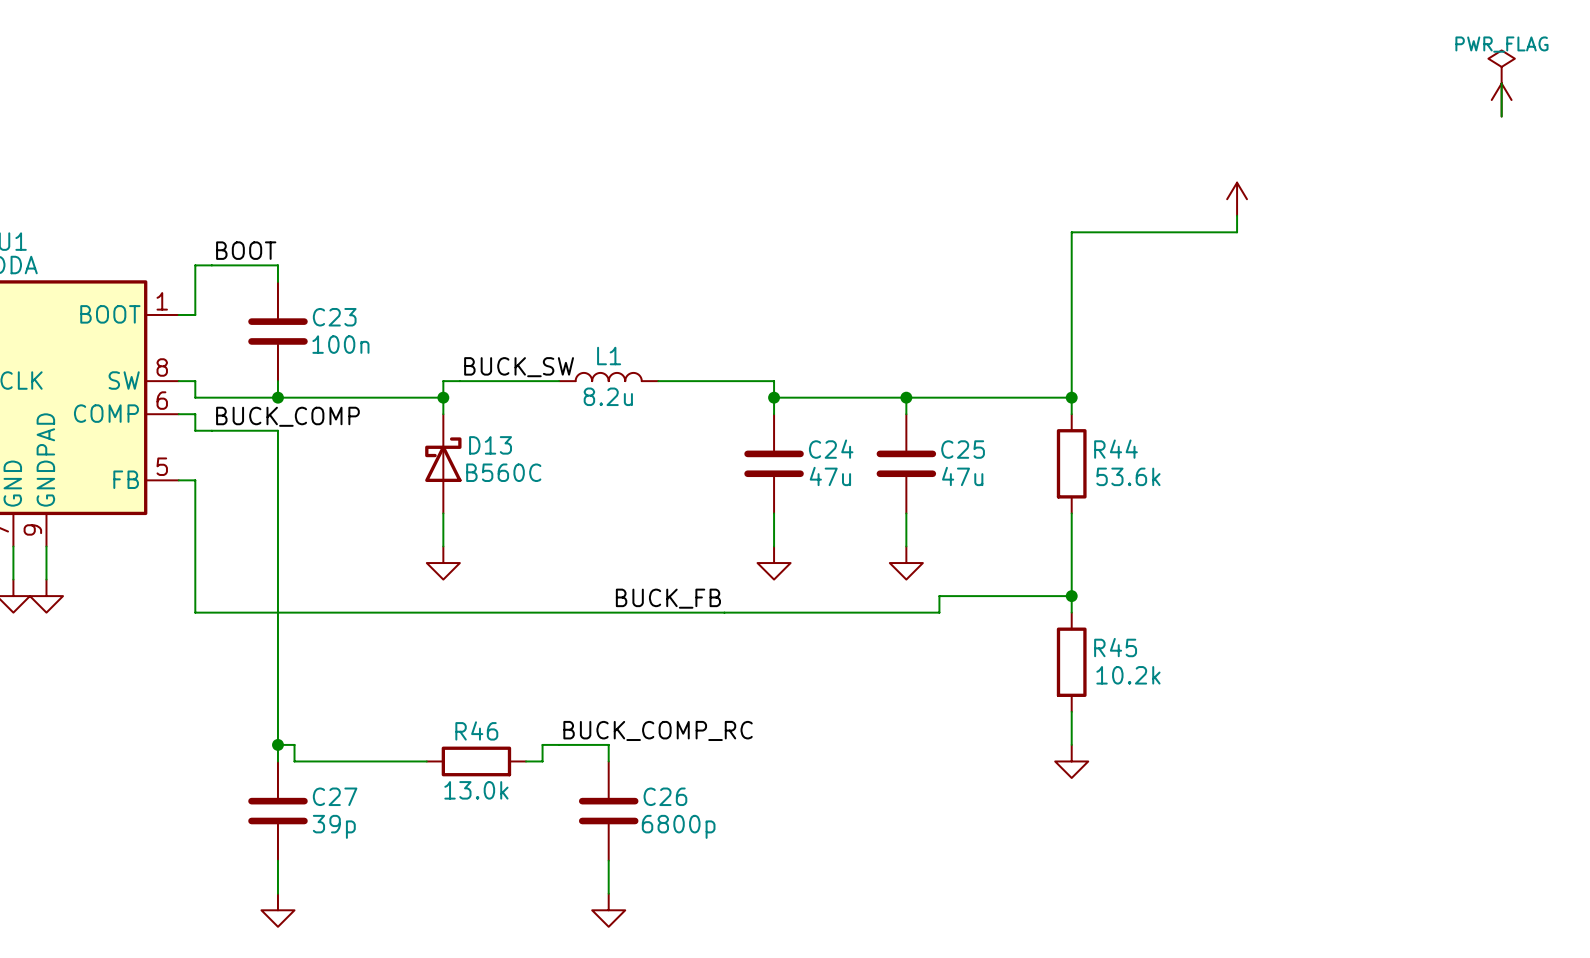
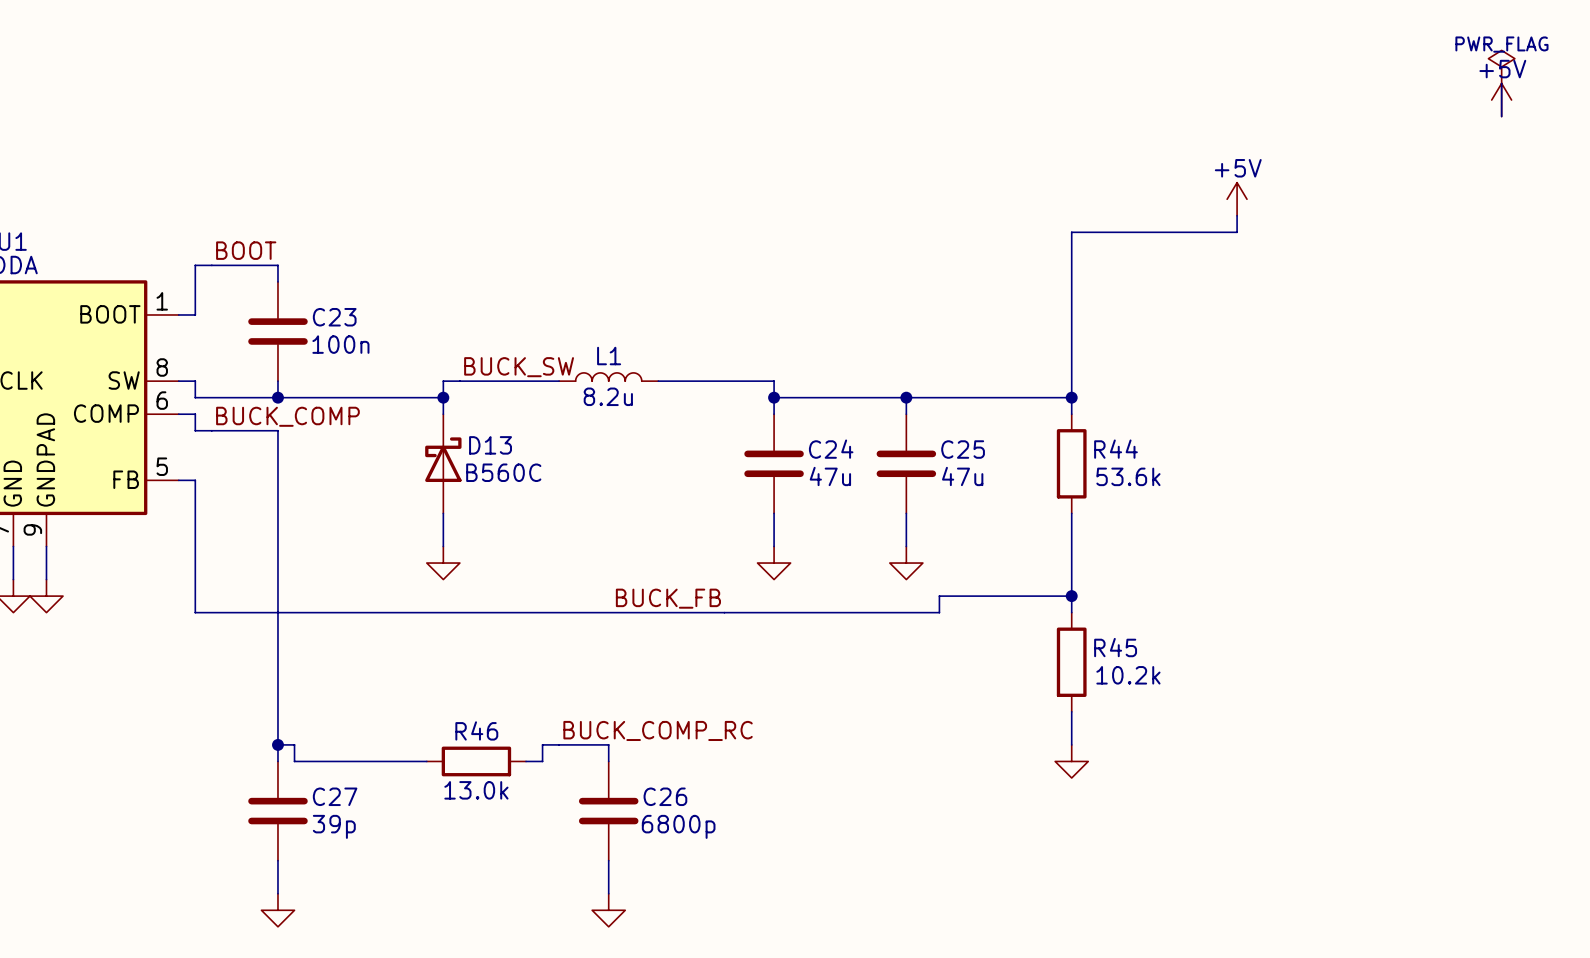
power symbol text: none -> +5V (1502, 69)
power symbol text: none -> +5V (1238, 168)

